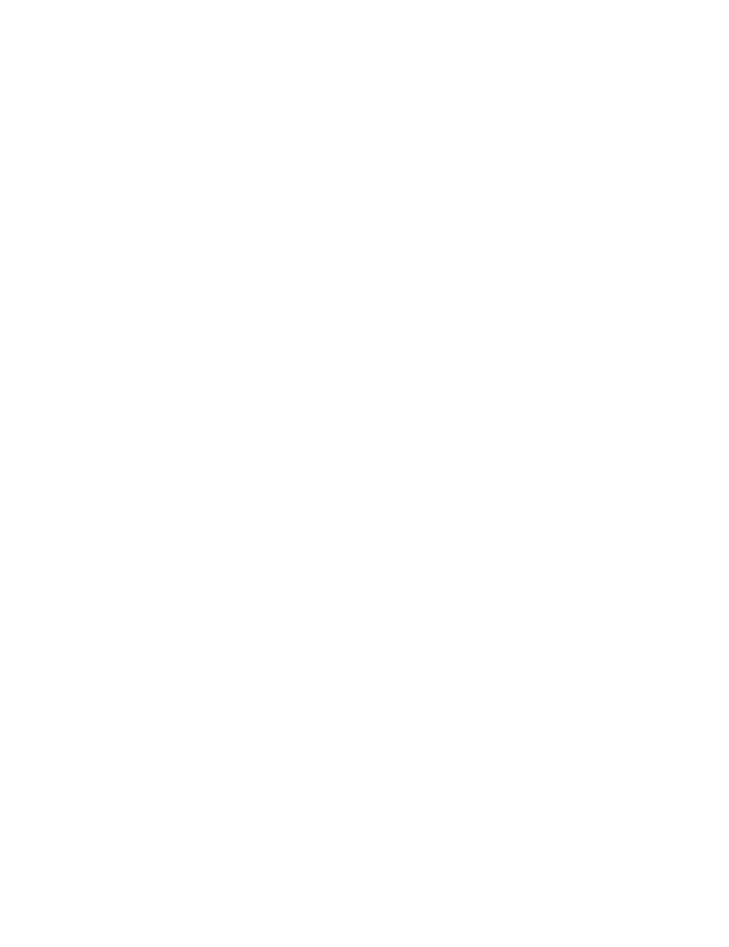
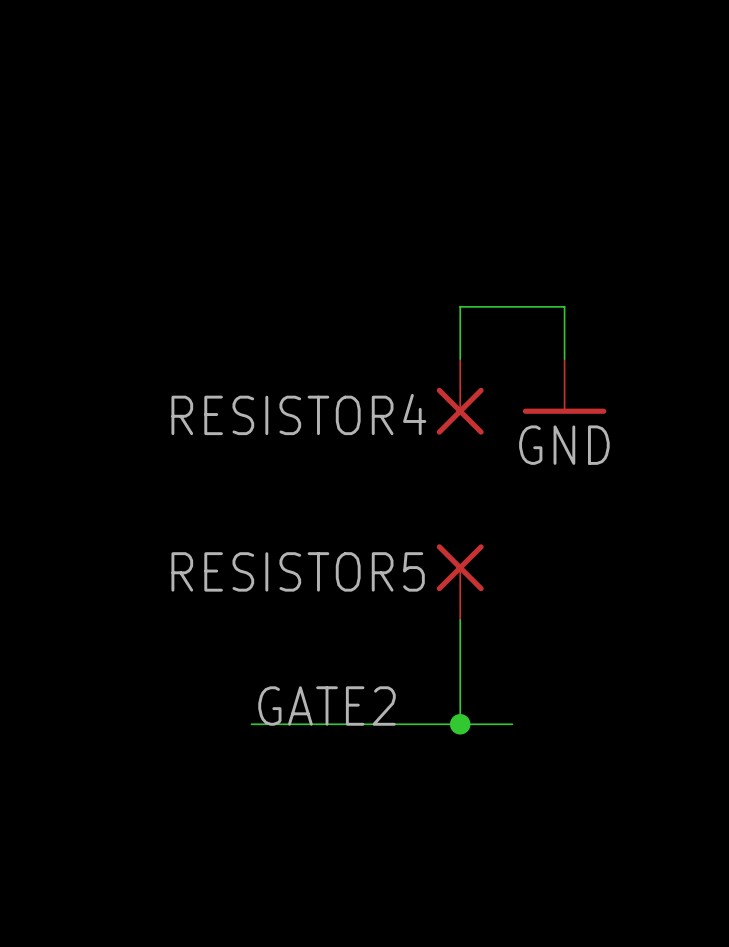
wire: none -> (460, 359) (460, 306) (564, 306) (564, 359)
power symbol: none -> GND (564, 386)
RESISTOR4: none -> (460, 396)
RESISTOR5: none -> (460, 582)
wire: none -> (460, 619) (460, 724)
label: none -> GATE2 (327, 706)
wire: none -> (251, 724) (512, 724)
junction: none -> (460, 724)

